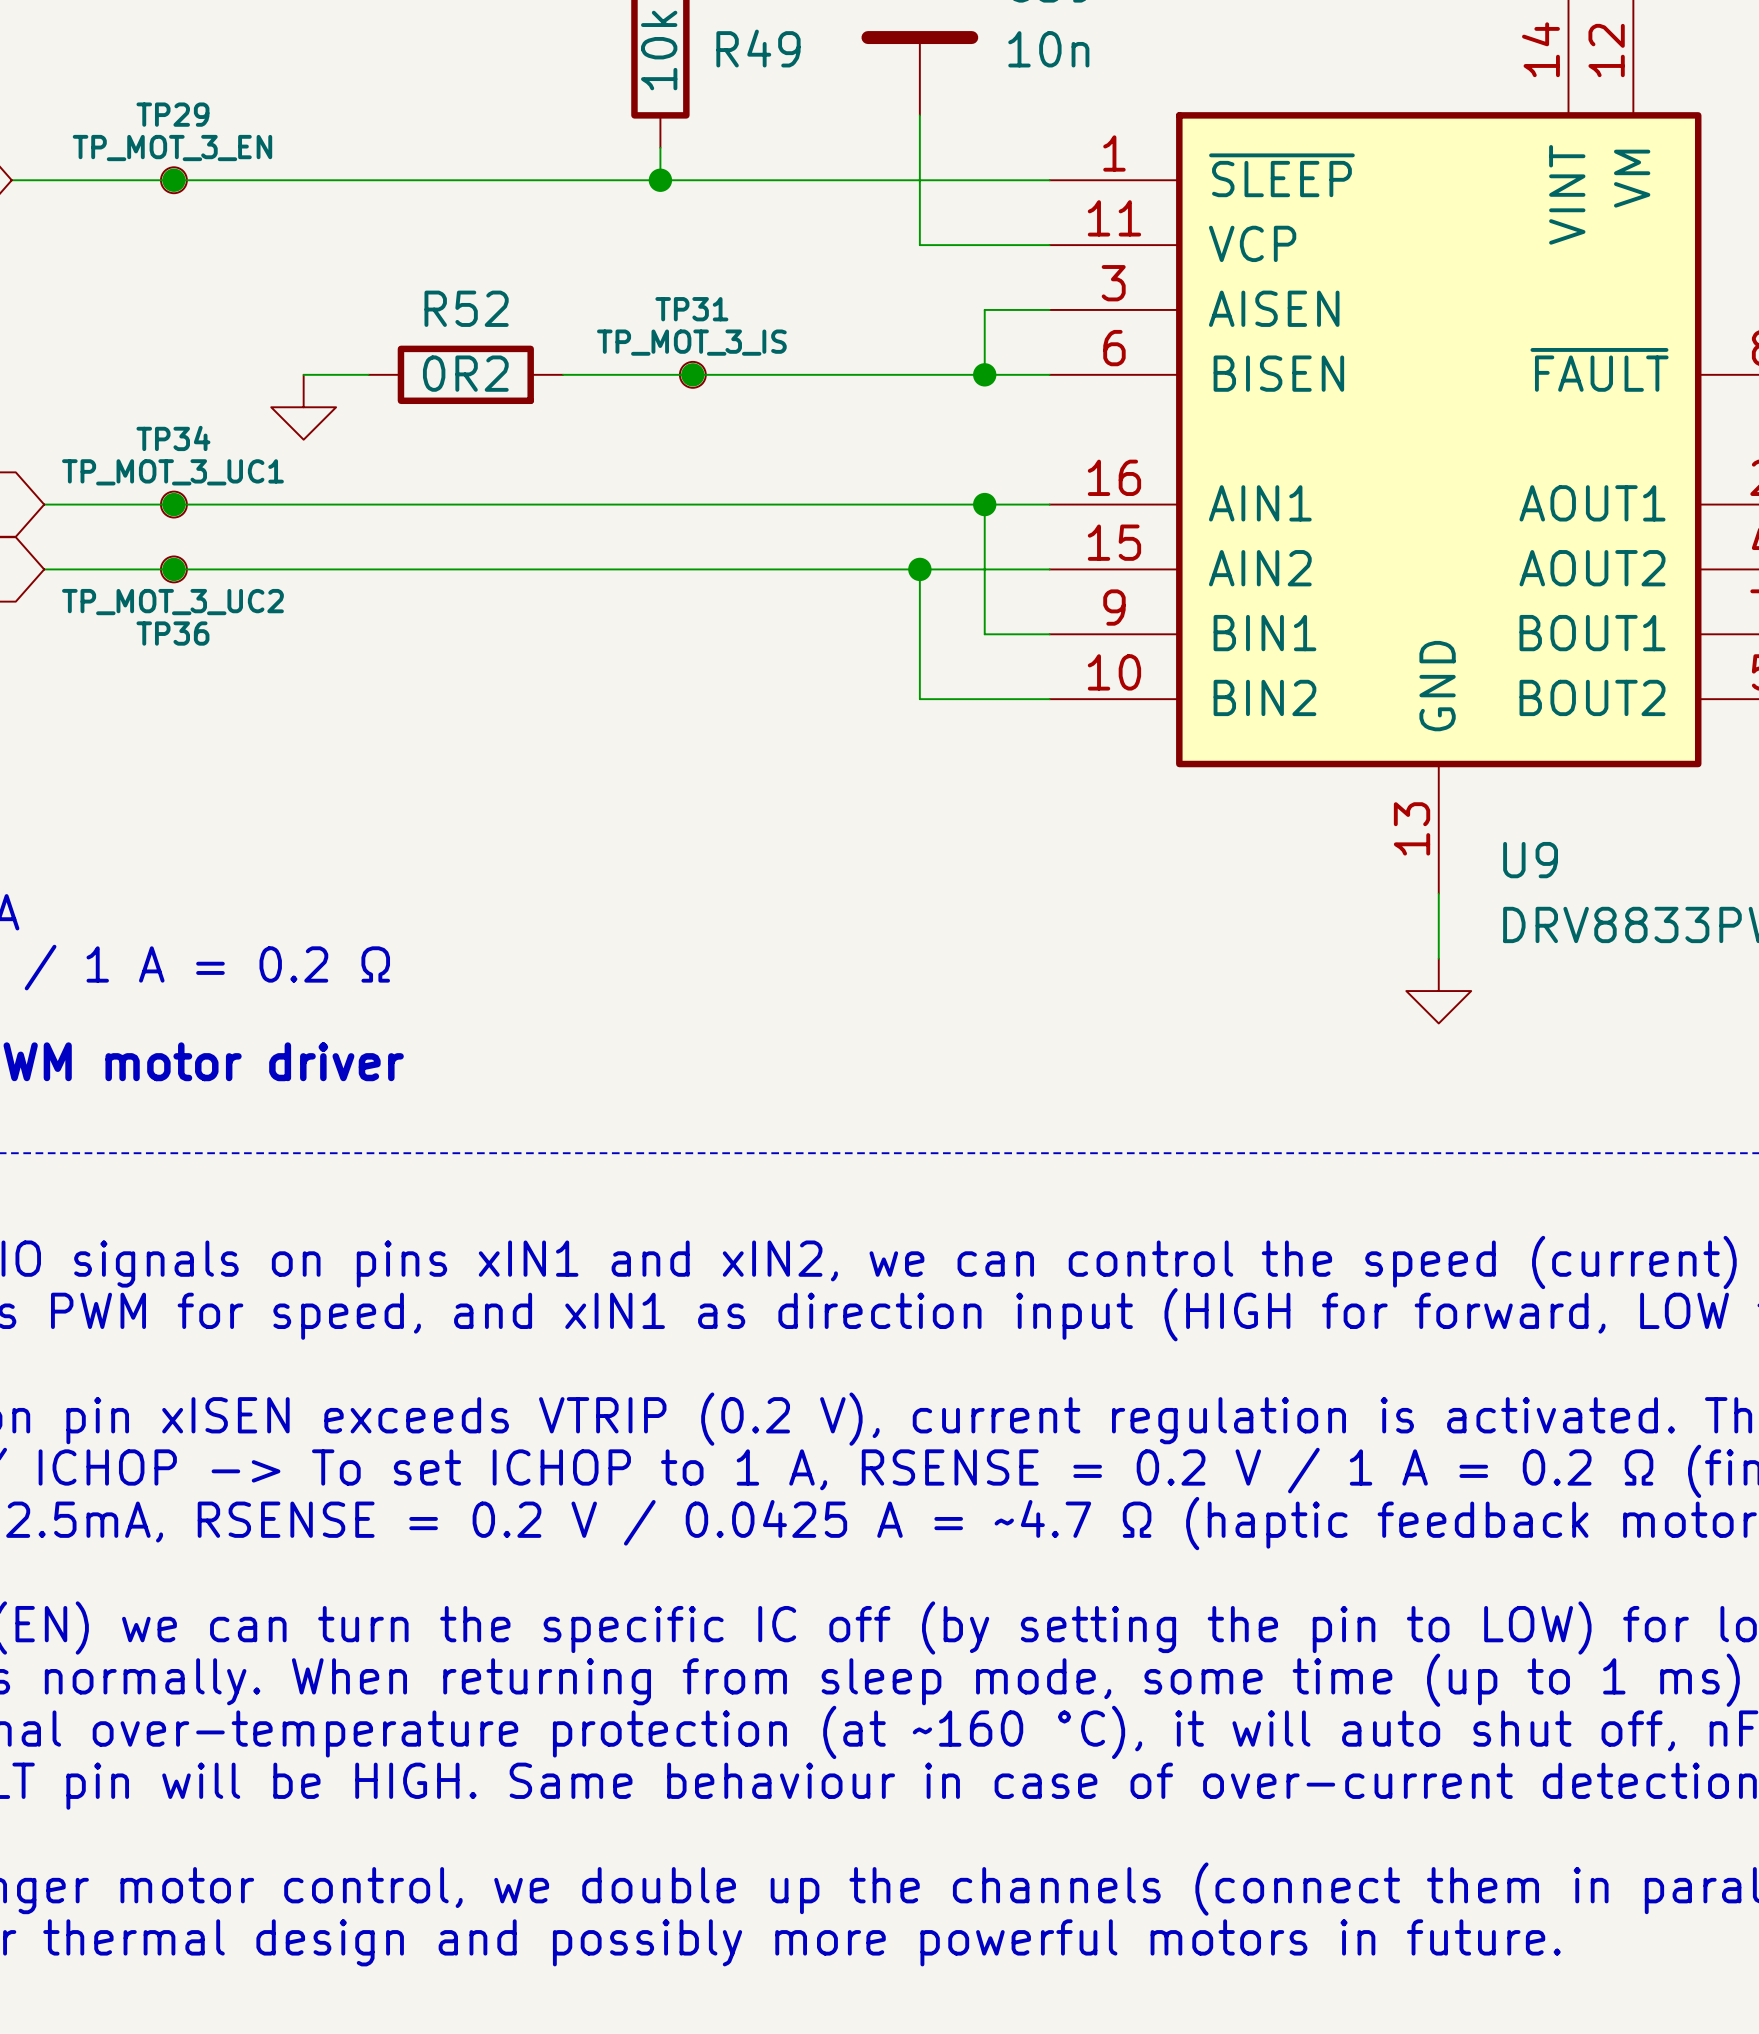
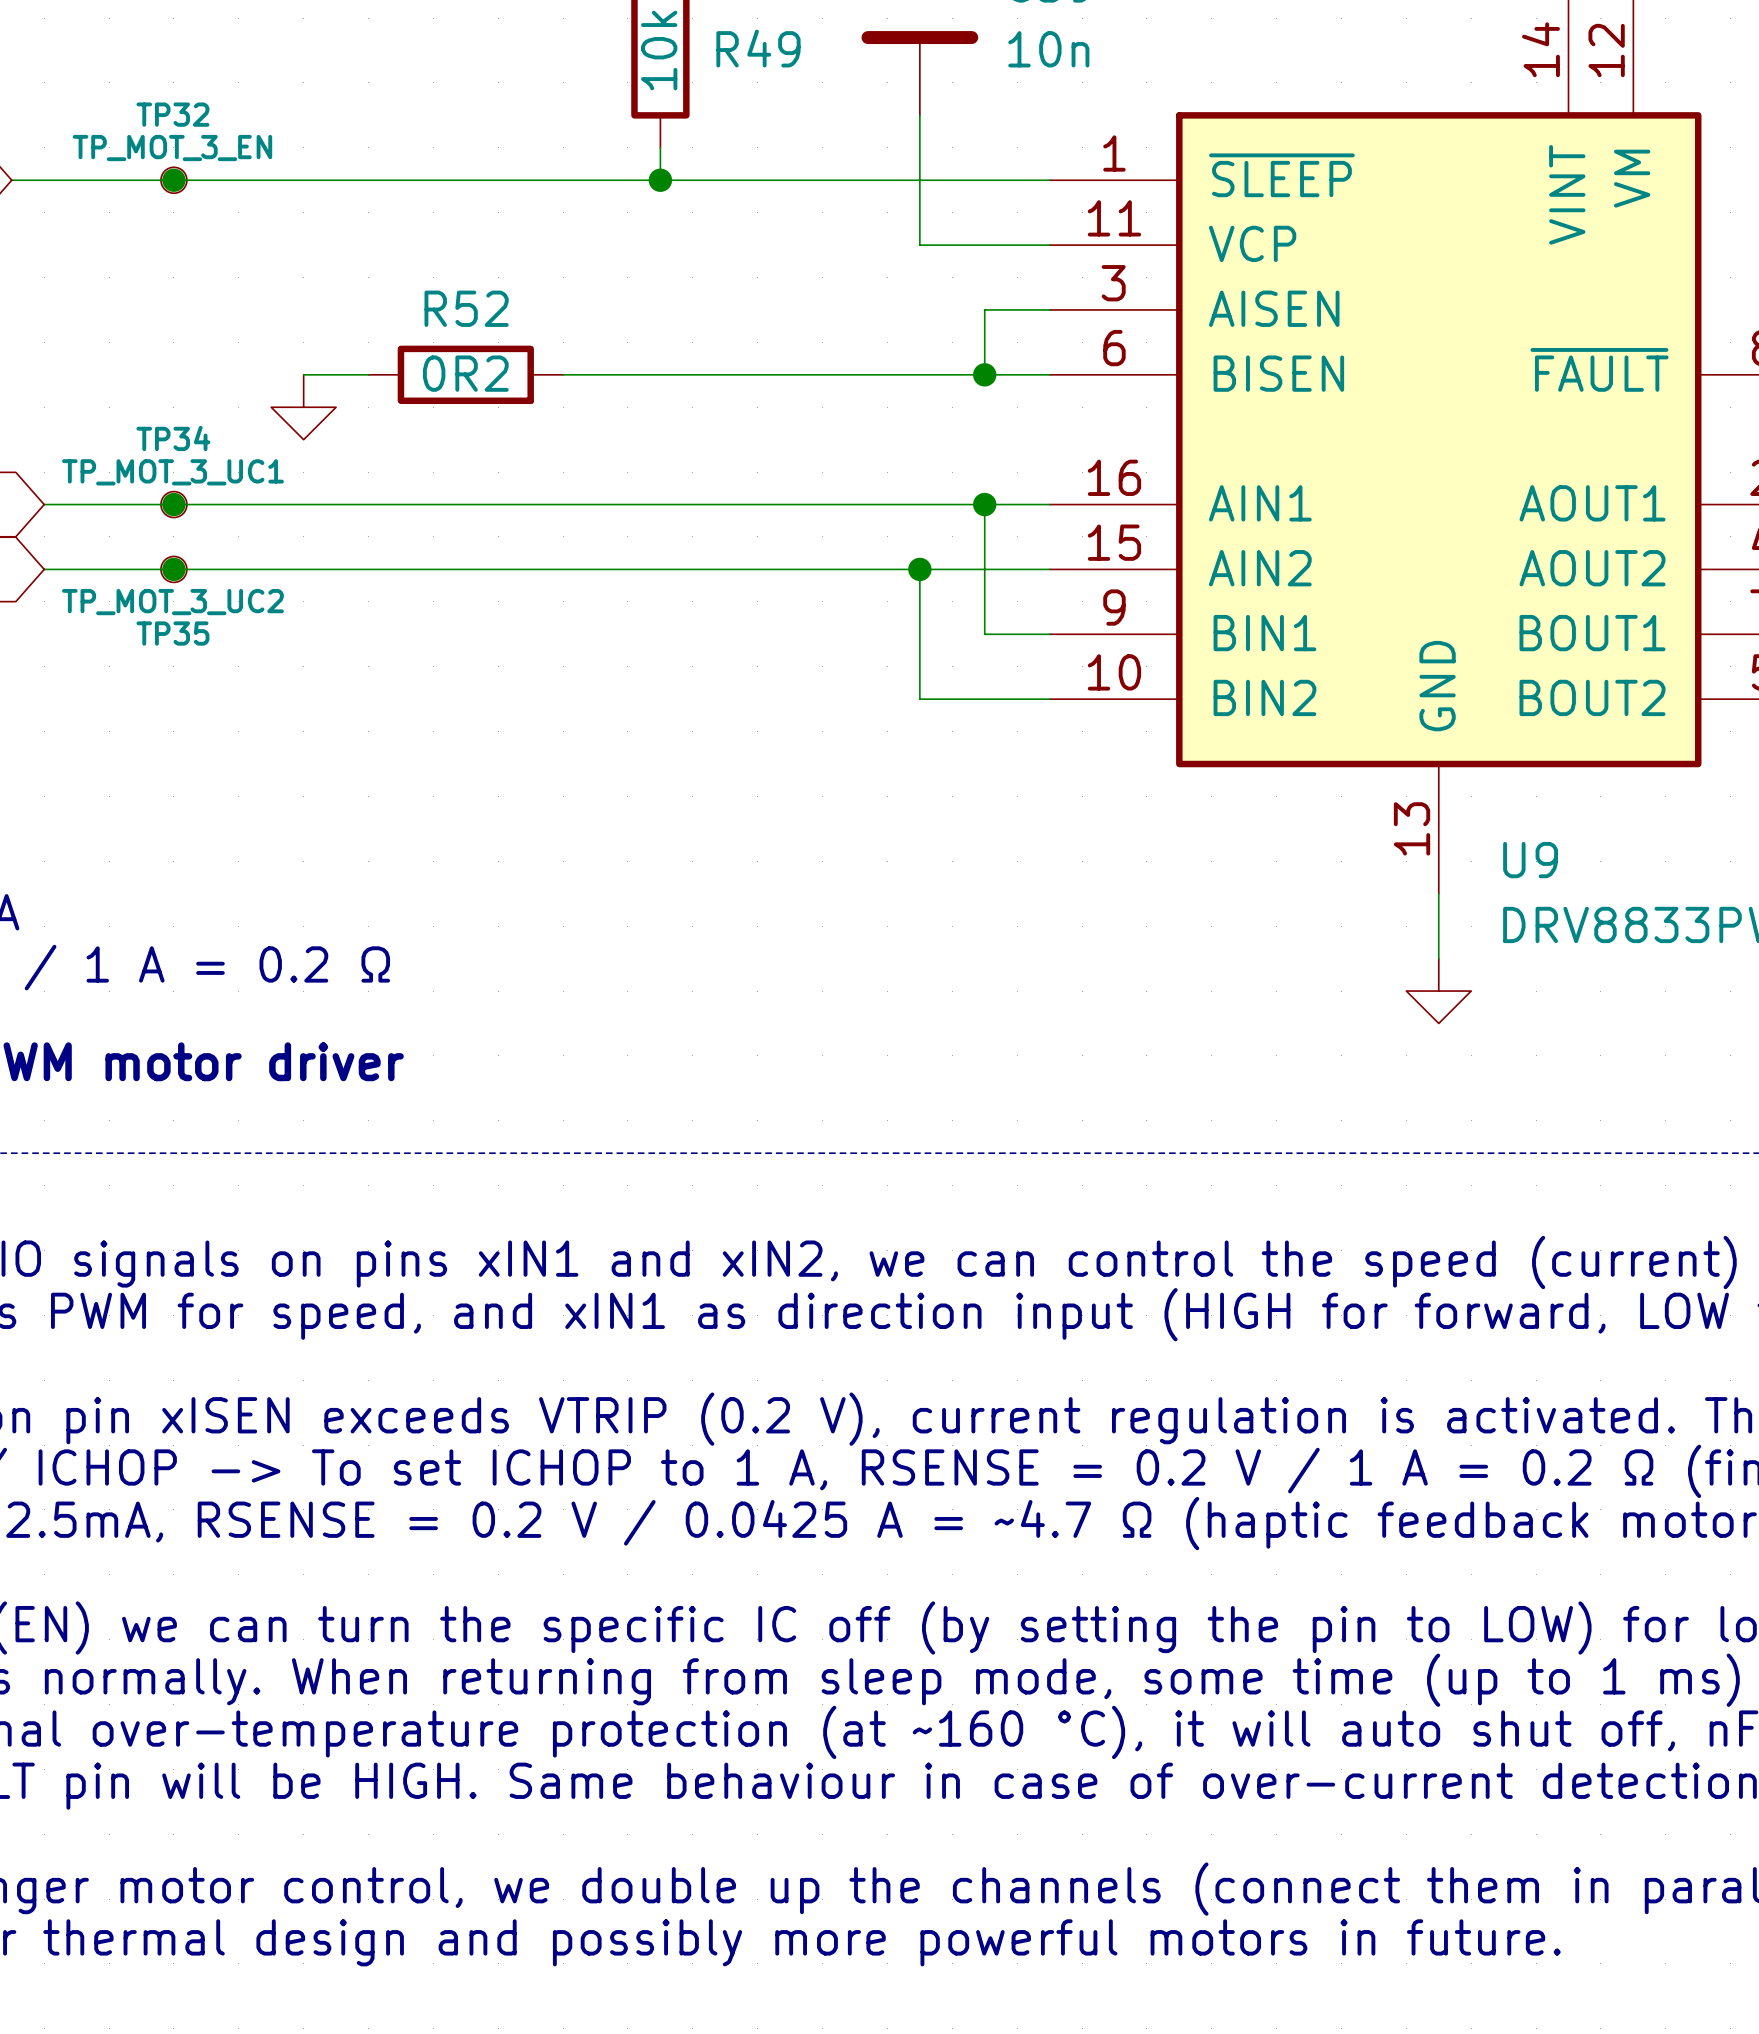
TP29 name: TP29 (172, 114) -> TP32 (172, 114)
junction: (692, 374) -> none
TP31: TP_MOT_3_IS (692, 374) -> none
TP36 name: TP36 (172, 633) -> TP35 (172, 633)

